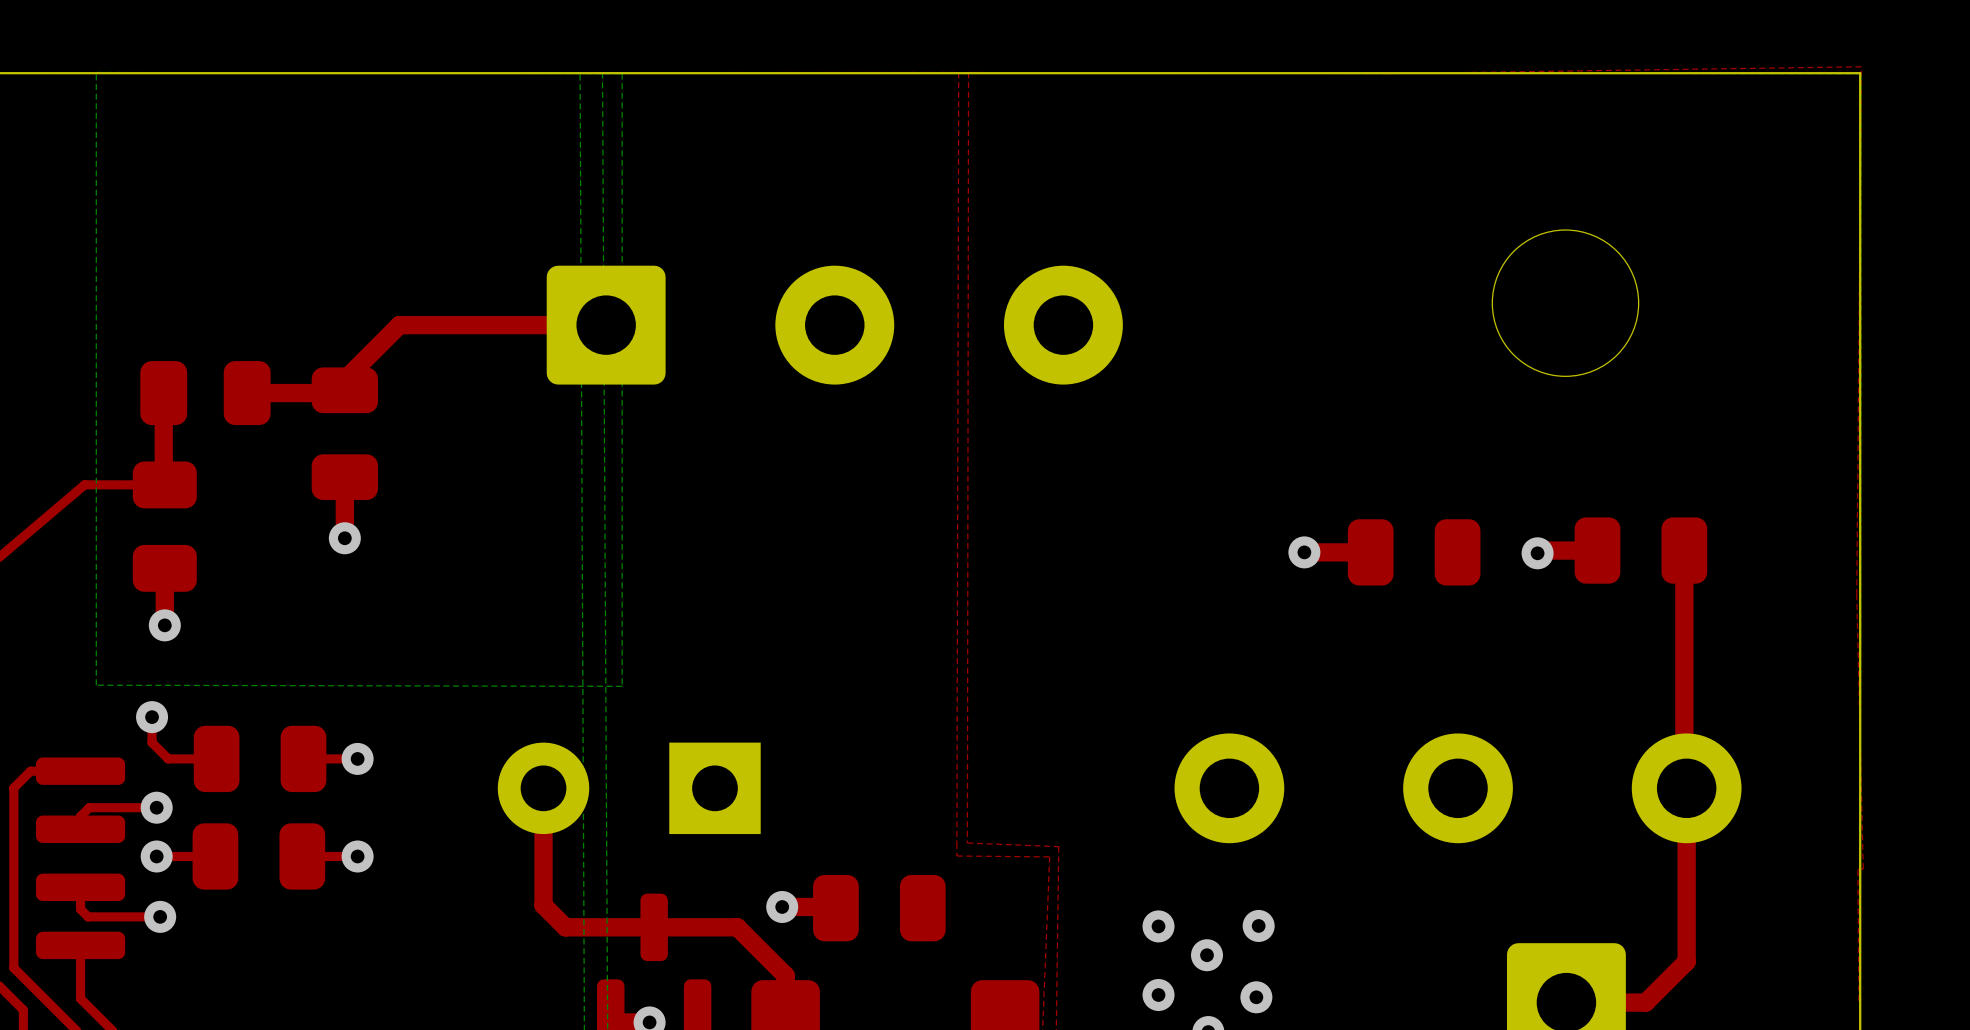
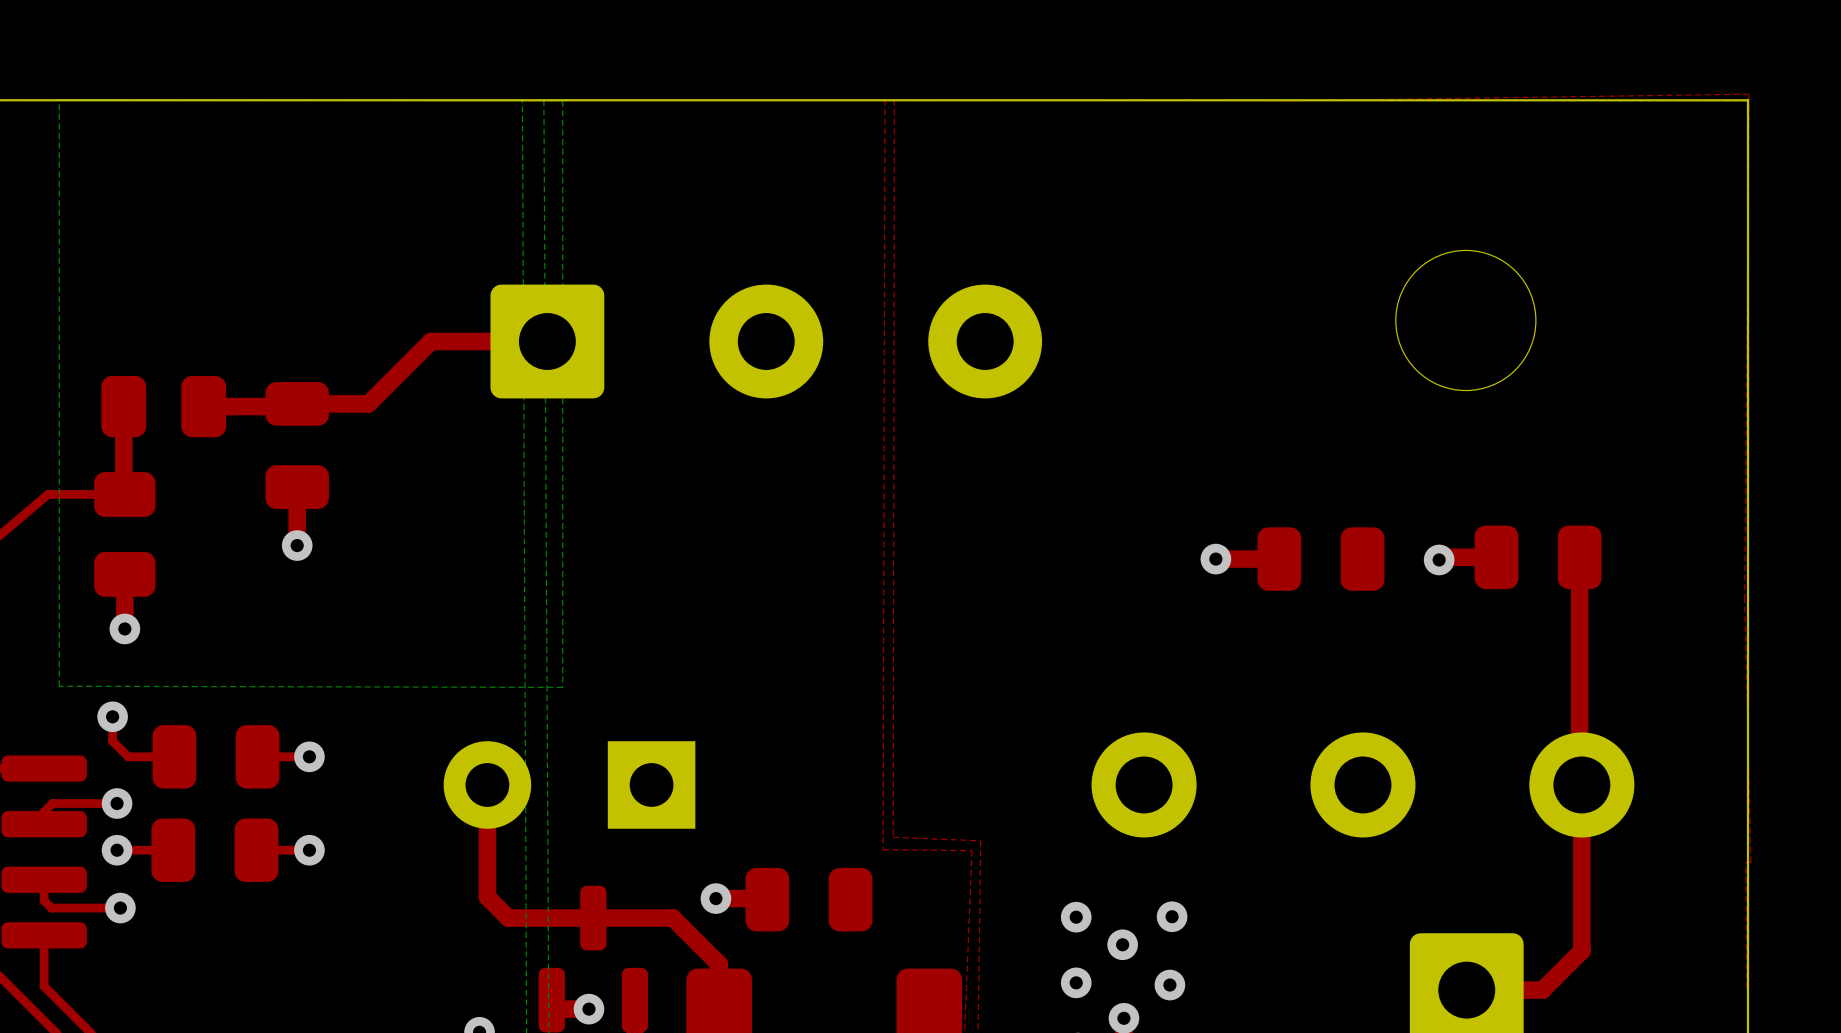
top track: (484, 325) (399, 325) (344, 380) -> (430, 341) (368, 403) (297, 403)

